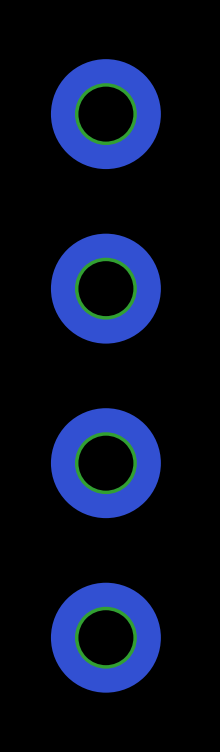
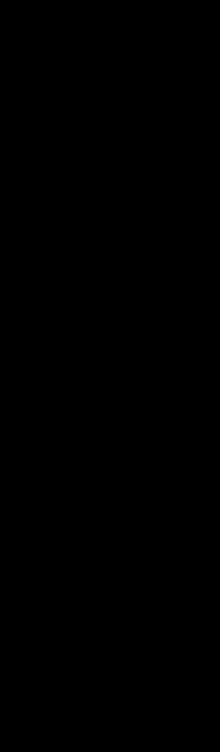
part: (105, 114) -> none
part: (105, 288) -> none
part: (105, 463) -> none
part: (105, 637) -> none

